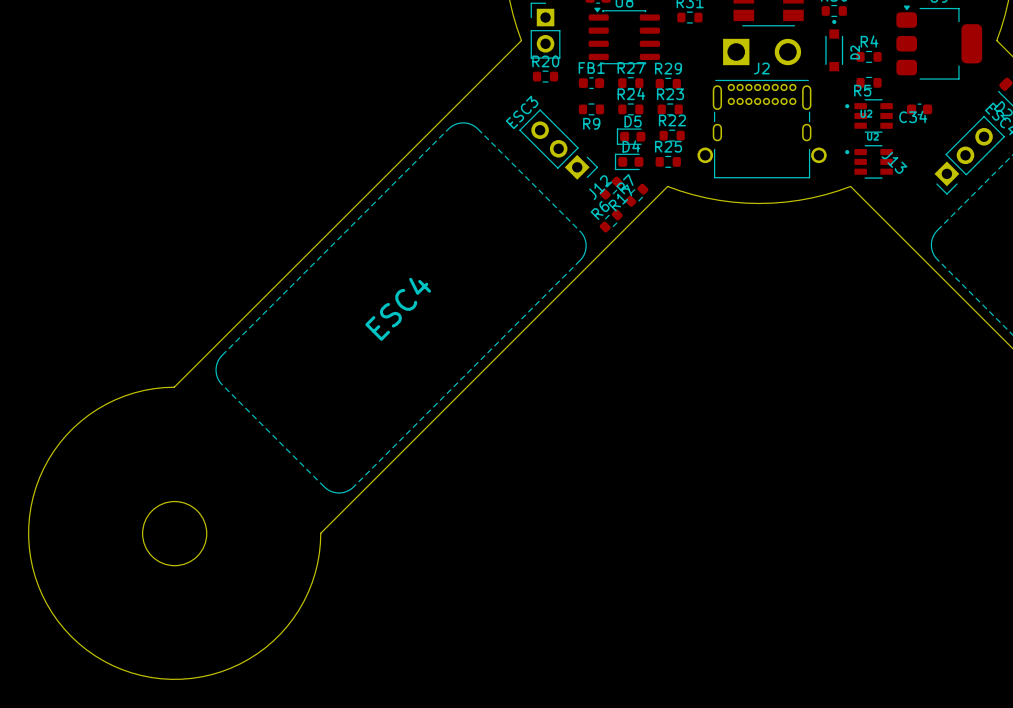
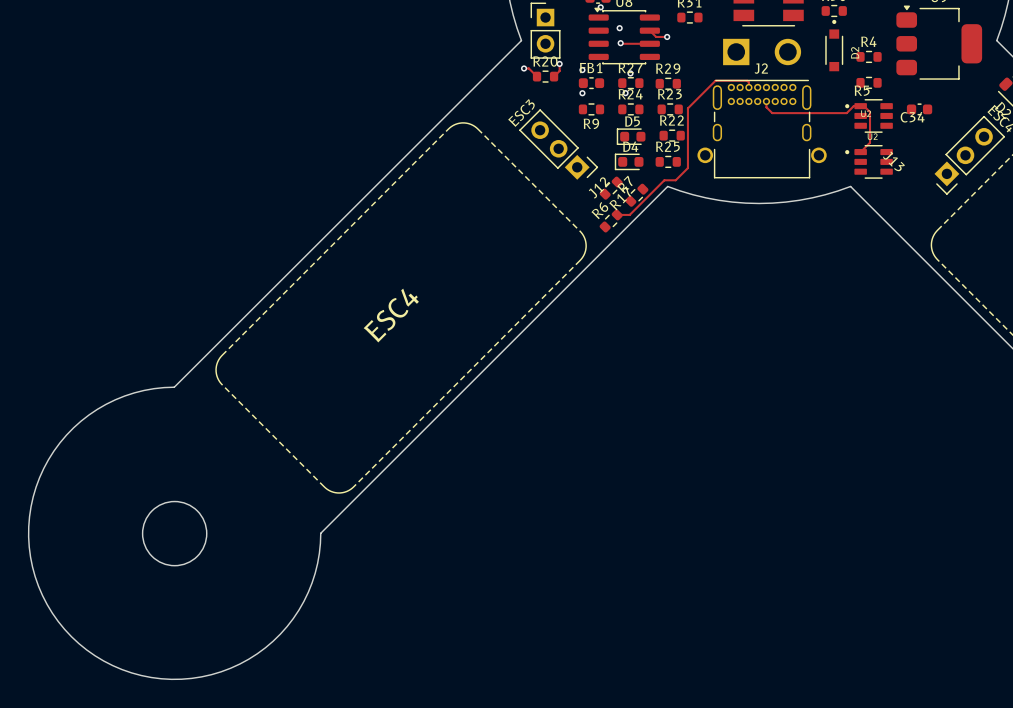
via: none -> (600, 7)
via: none -> (619, 28)
track: none -> (649, 30) (656, 36) (667, 36)
via: none -> (667, 36)
track: none -> (620, 43) (649, 43)
via: none -> (620, 43)
track: none -> (559, 63) (559, 71) (554, 76)
via: none -> (559, 63)
track: none -> (524, 68) (528, 68) (537, 76)
via: none -> (524, 68)
via: none -> (582, 70)
via: none -> (630, 73)
track: none -> (748, 87) (747, 80) (715, 80) (687, 108) (687, 168) (675, 180) (664, 180) (629, 214) (617, 214)
via: none -> (582, 93)
via: none -> (625, 93)
track: none -> (766, 101) (766, 107) (772, 113) (846, 113) (853, 106) (864, 106) (870, 112) (870, 142) (860, 152)

